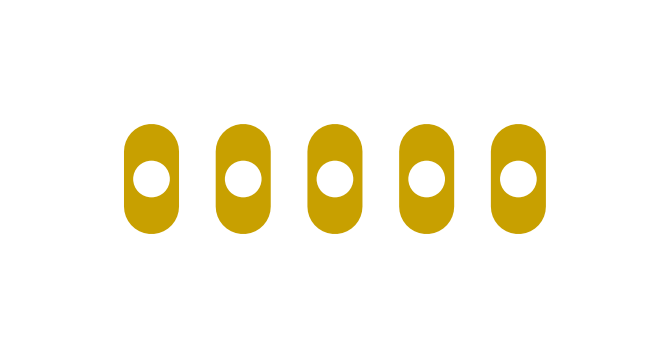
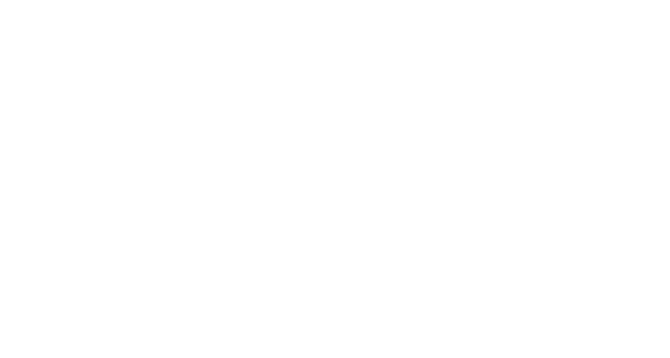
part: (334, 179) -> none

